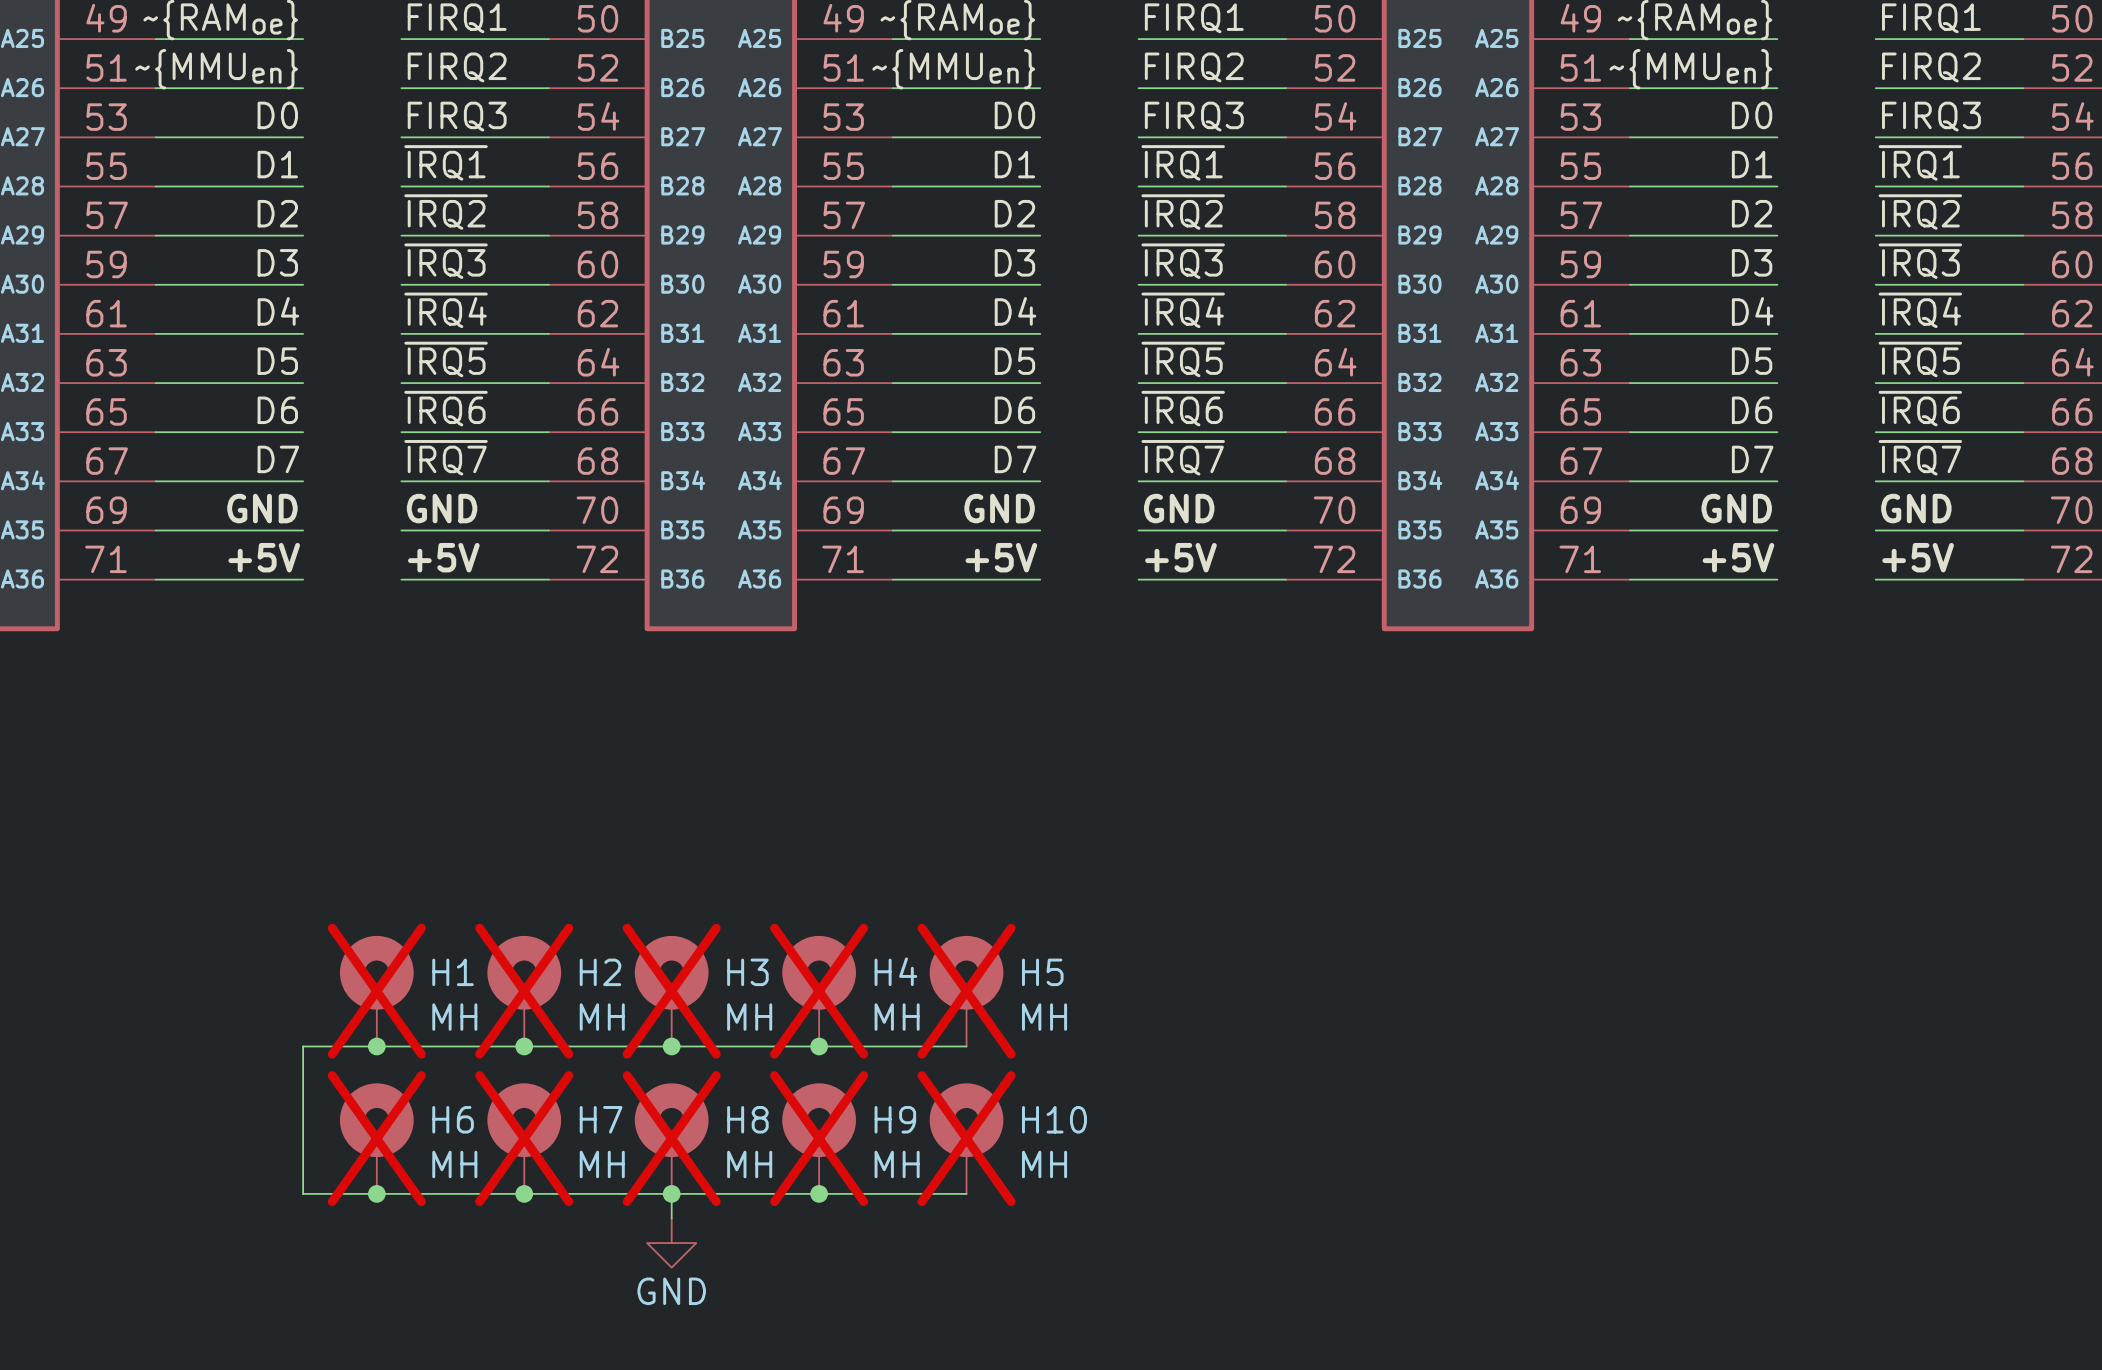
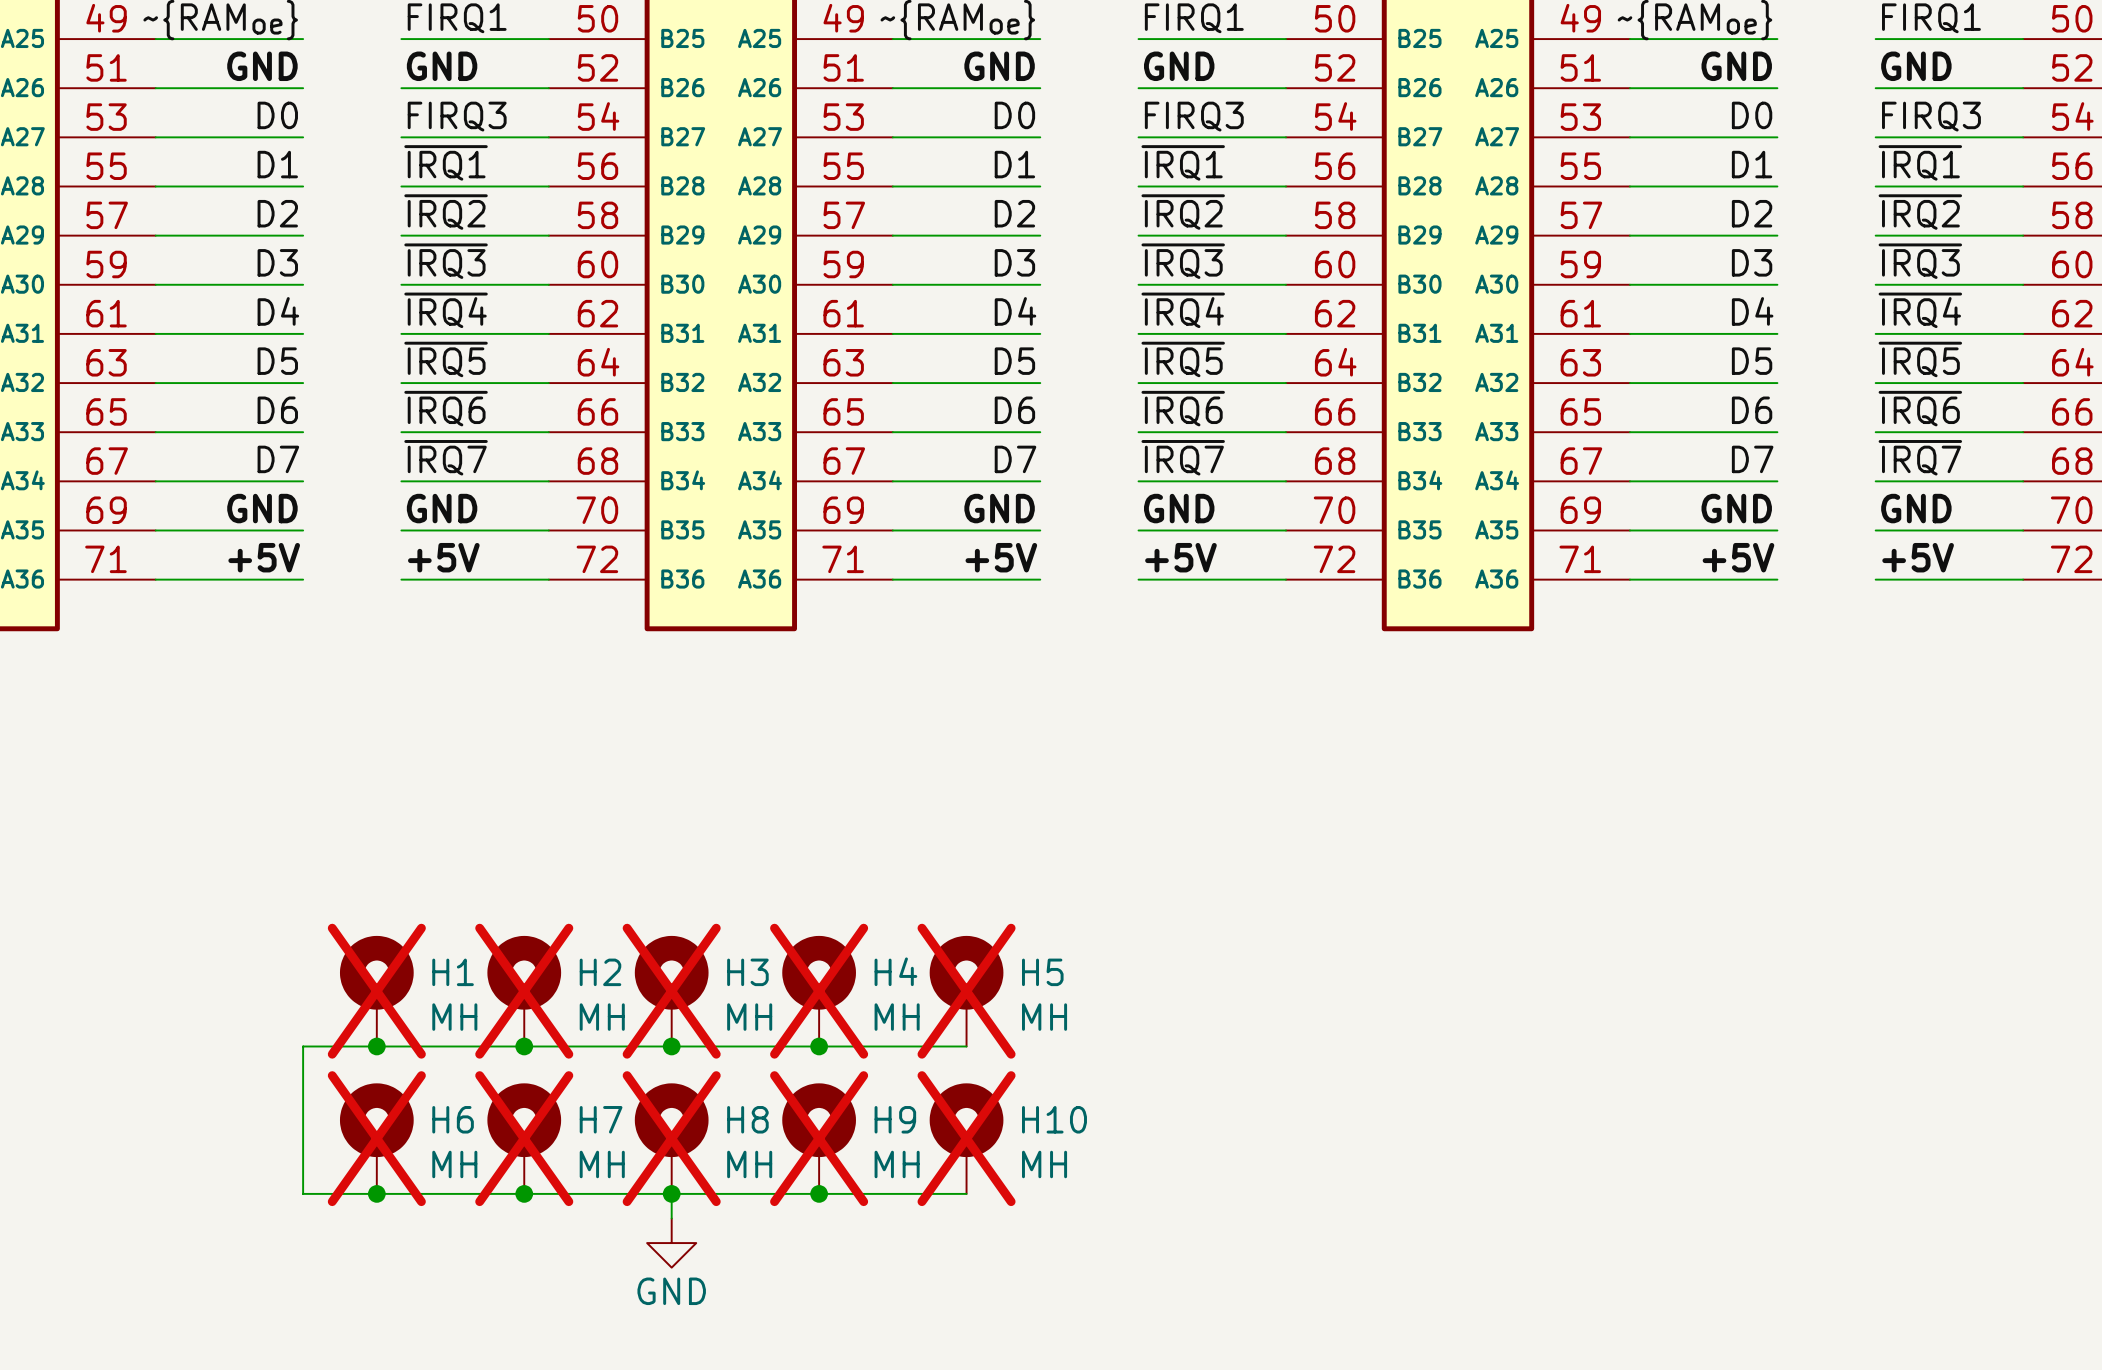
label: FIRQ2 (457, 67) -> GND (442, 66)
label: FIRQ2 (1194, 67) -> GND (1179, 66)
label: FIRQ2 (1931, 67) -> GND (1916, 66)
label: ~{MMUen} (216, 69) -> GND (262, 66)
label: ~{MMUen} (953, 69) -> GND (999, 66)
label: ~{MMUen} (1690, 69) -> GND (1736, 66)

